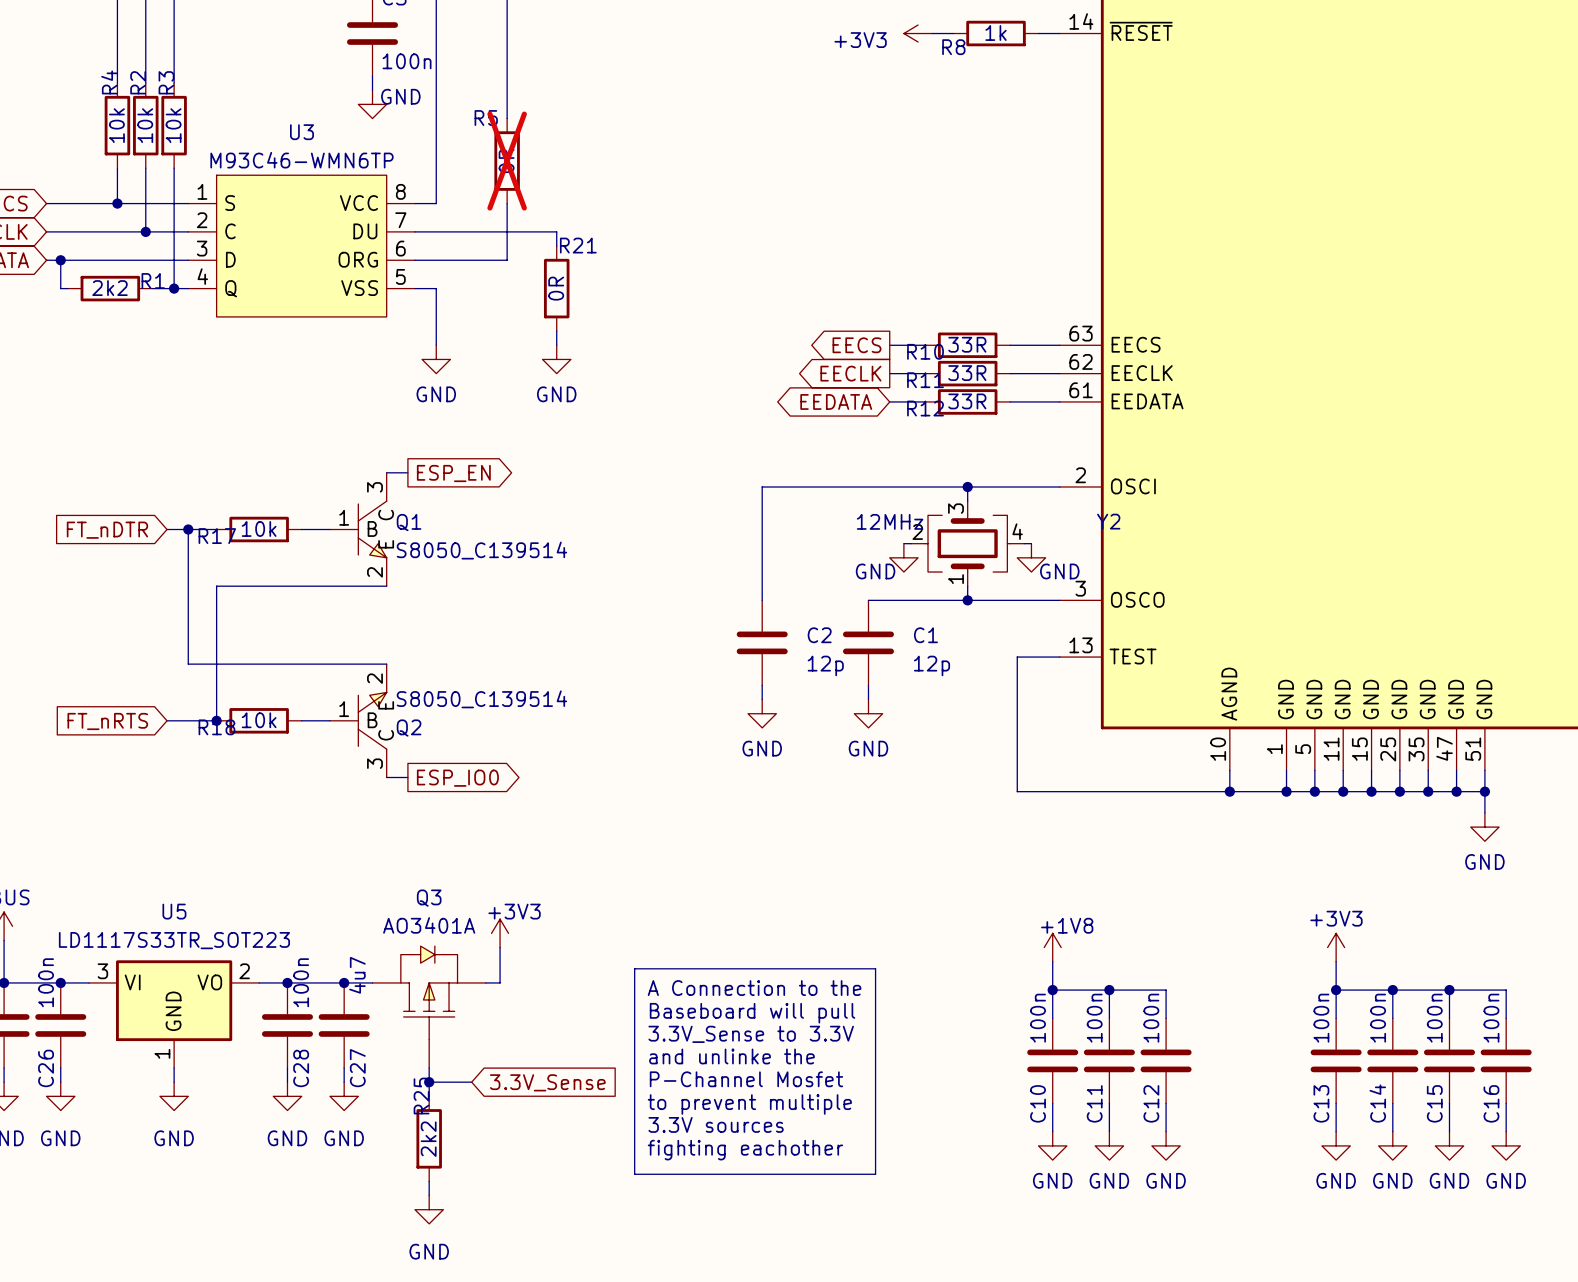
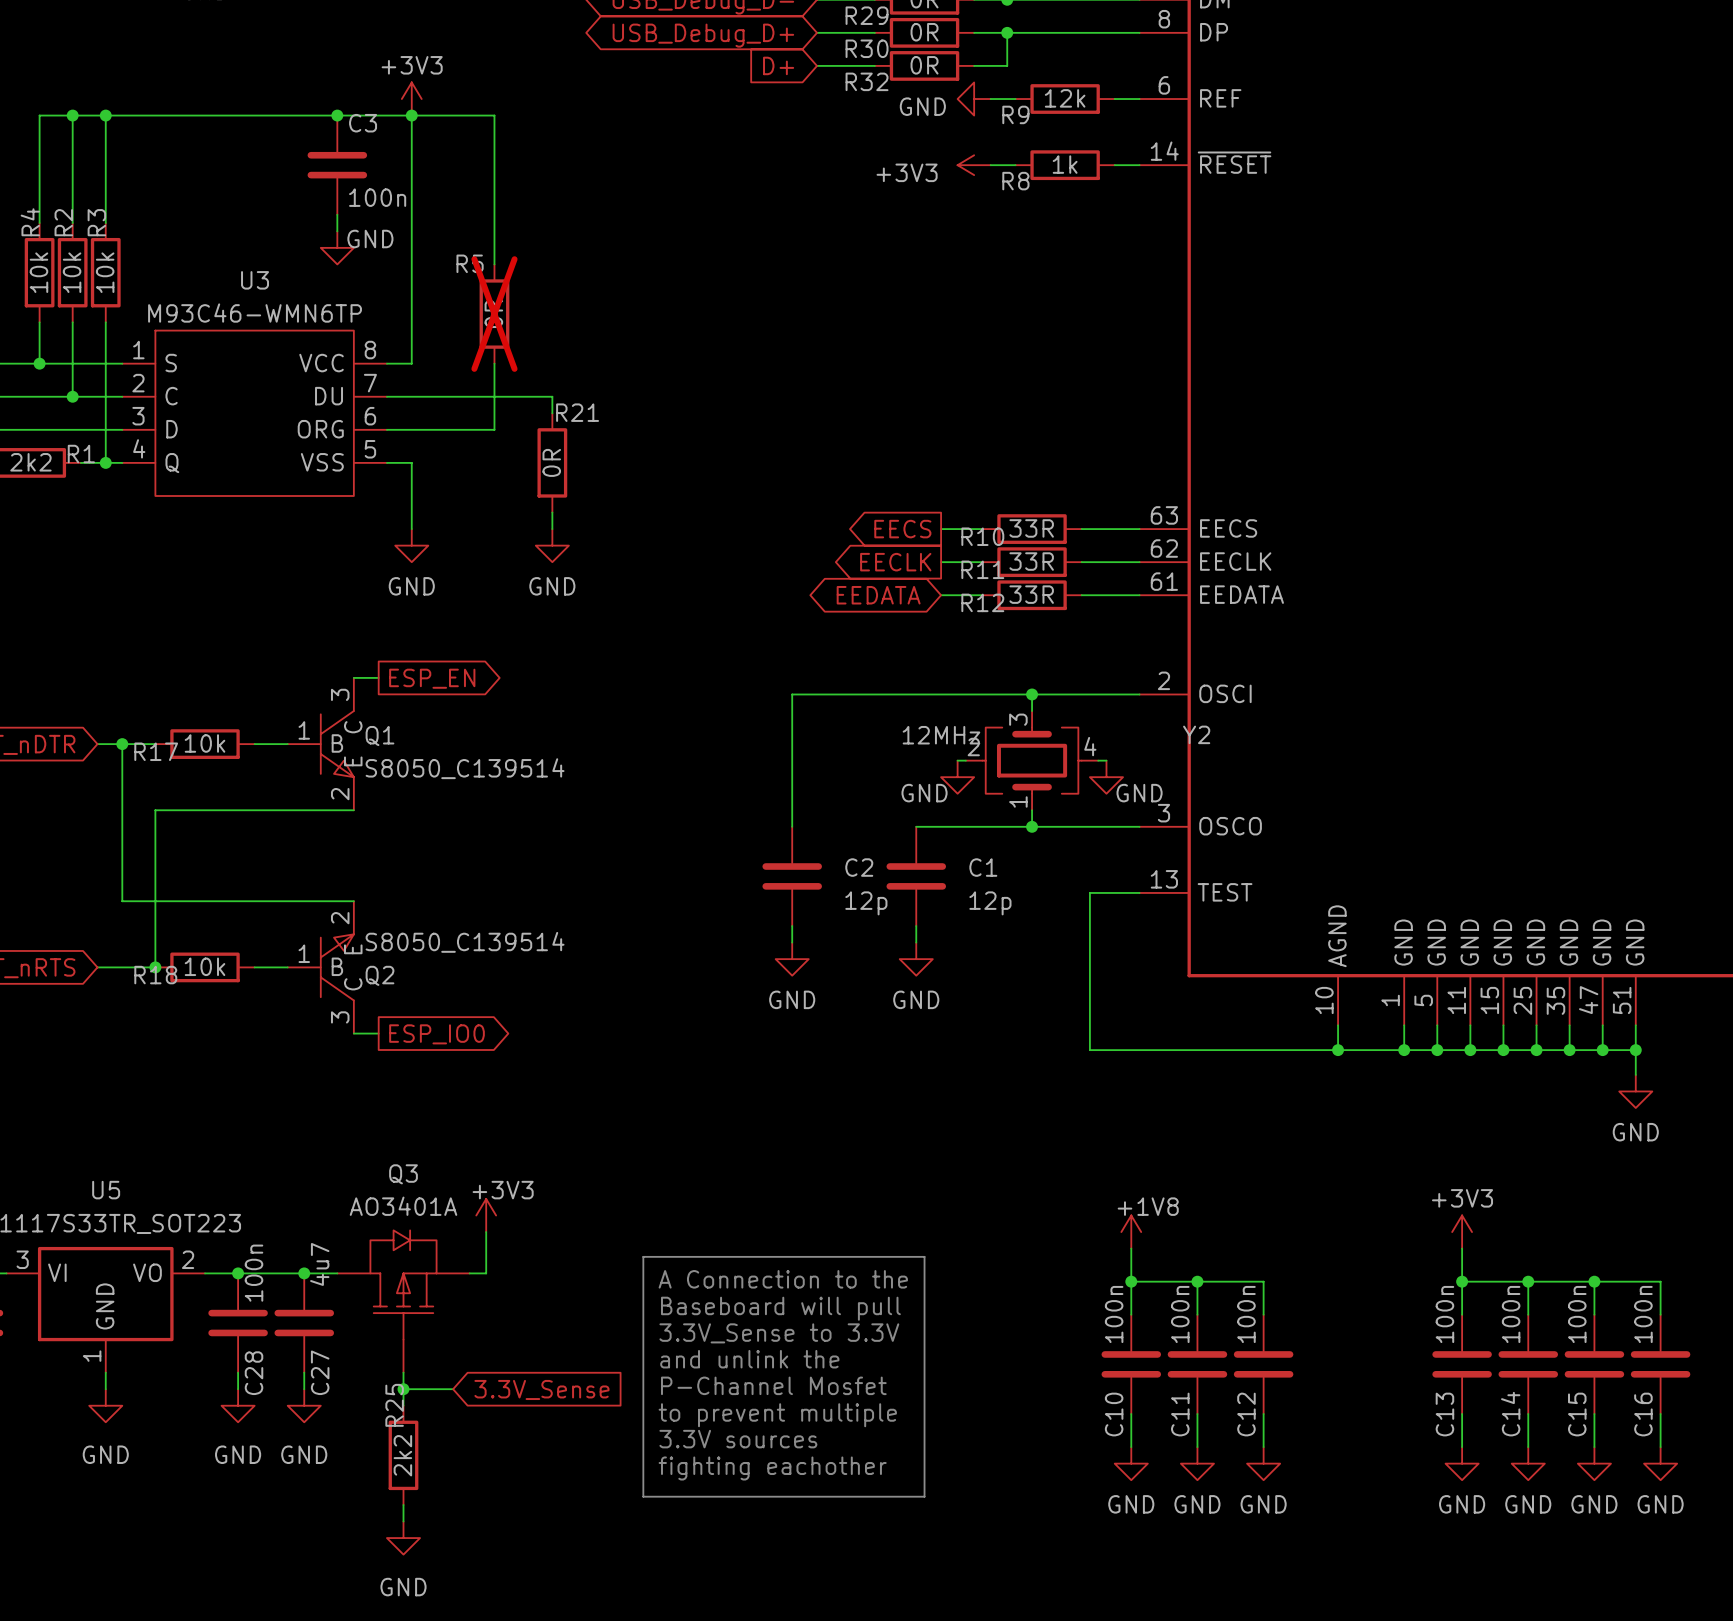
text: and unlinke the (731, 1056) -> and unlink the (749, 1359)

